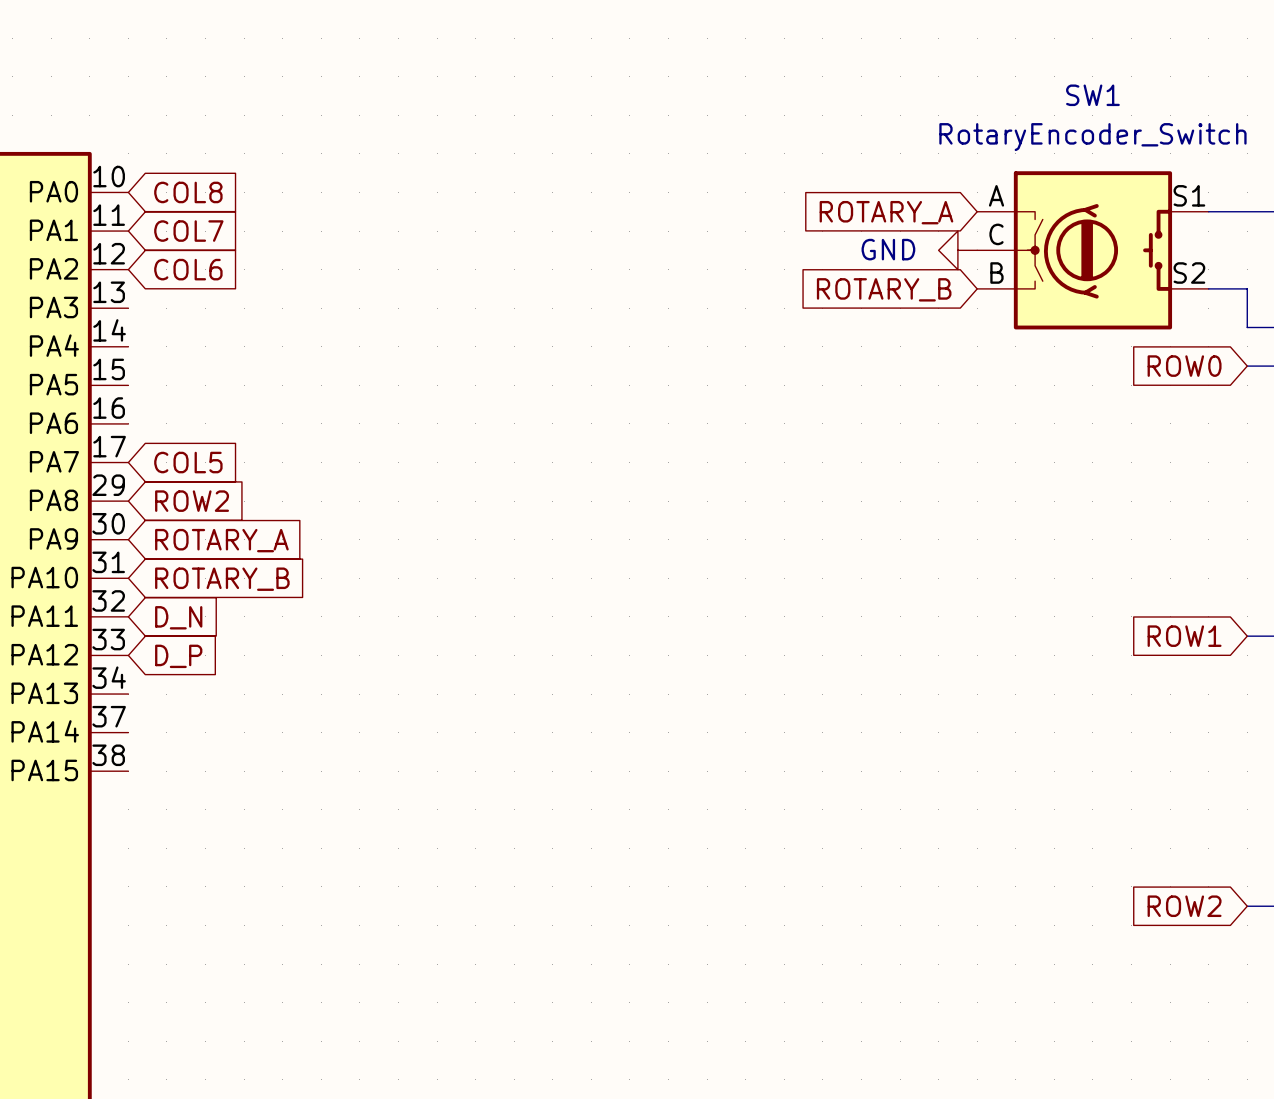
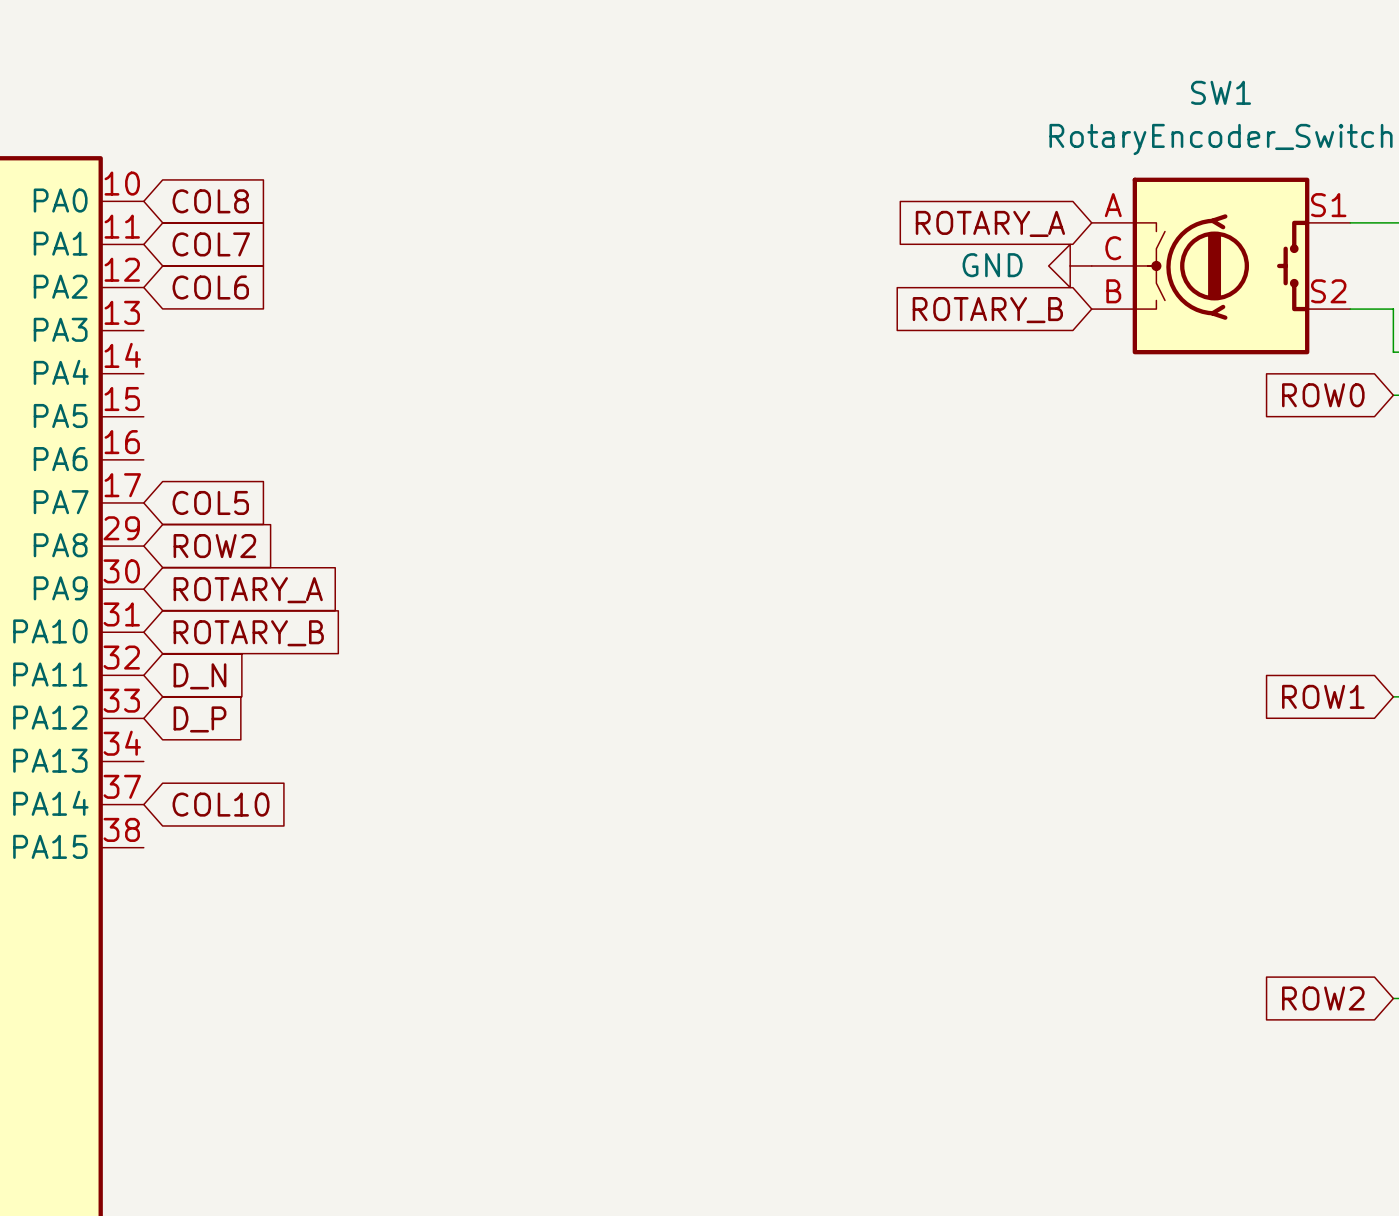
global label: none -> COL10 (221, 804)

